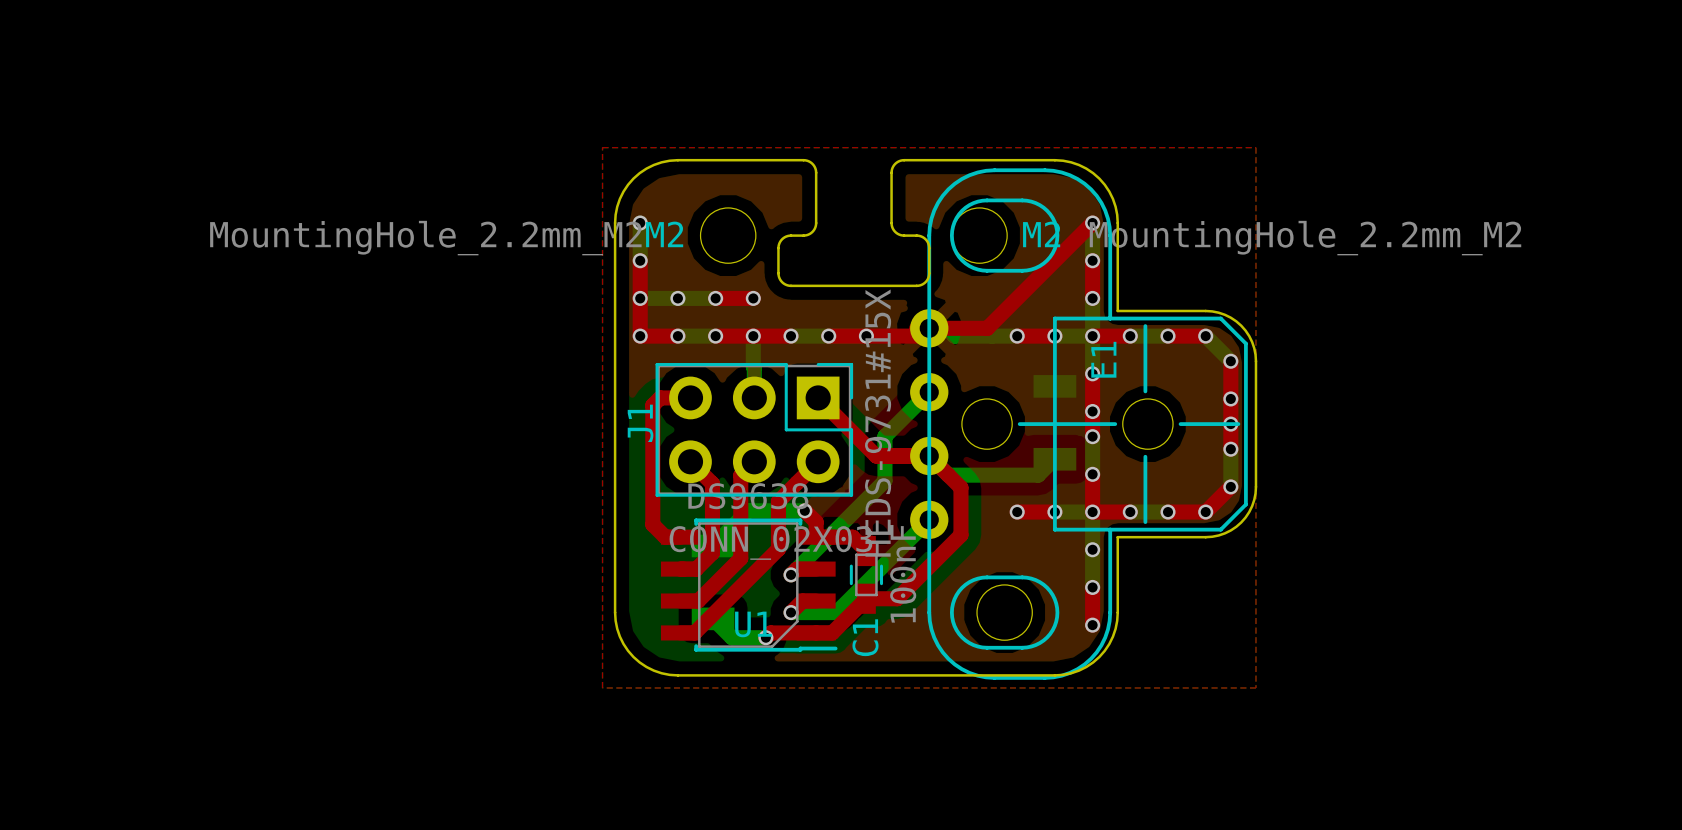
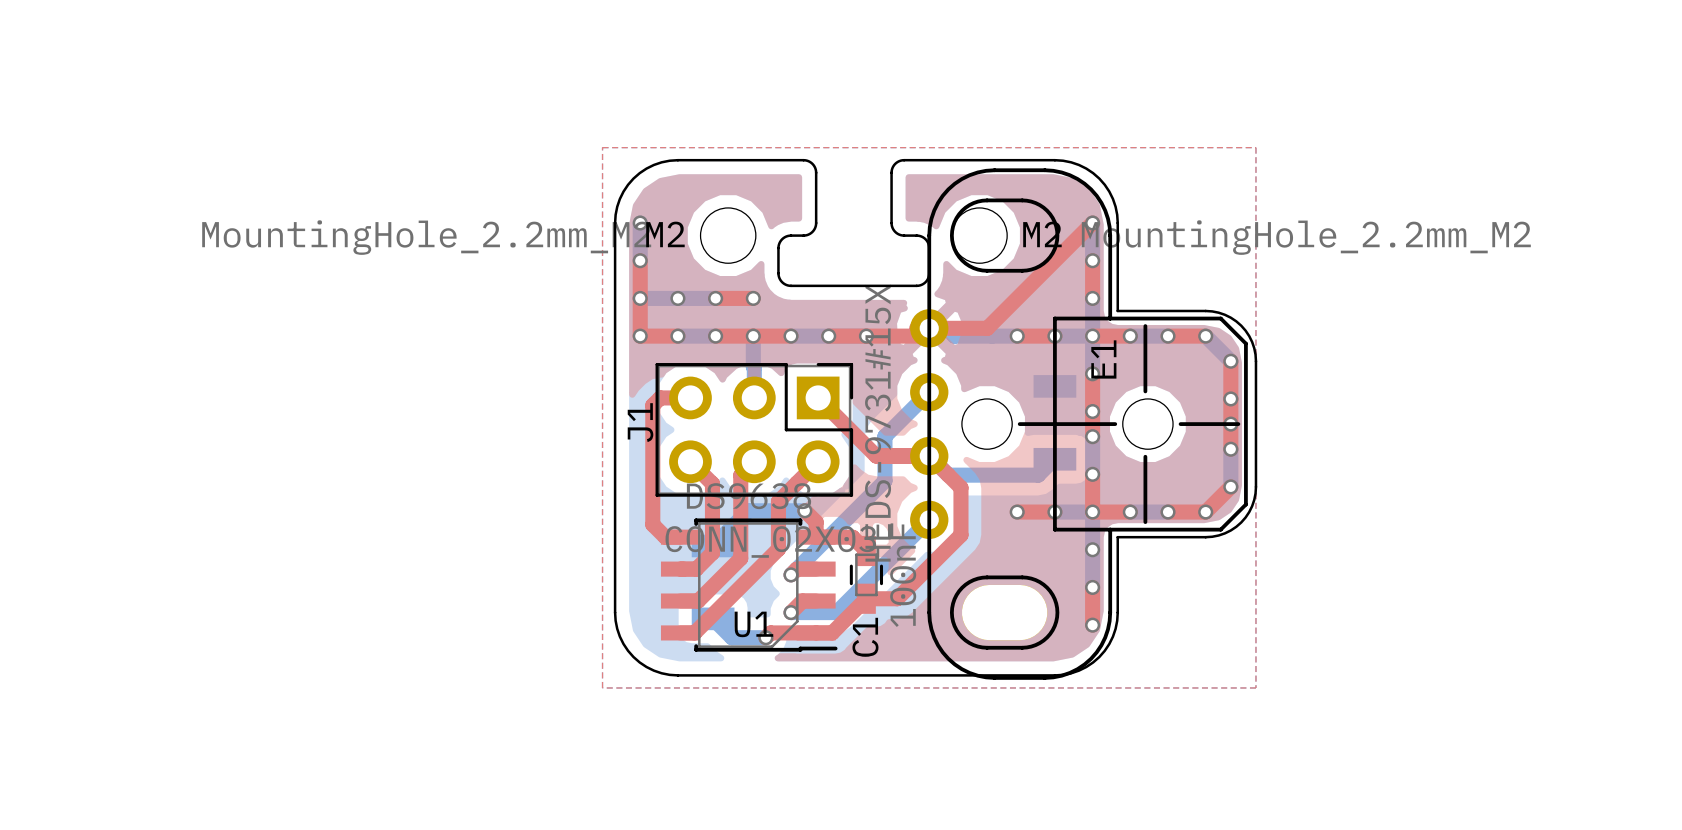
E1 footprint: [910, 168, 1248, 680] -> [910, 168, 1248, 680]

